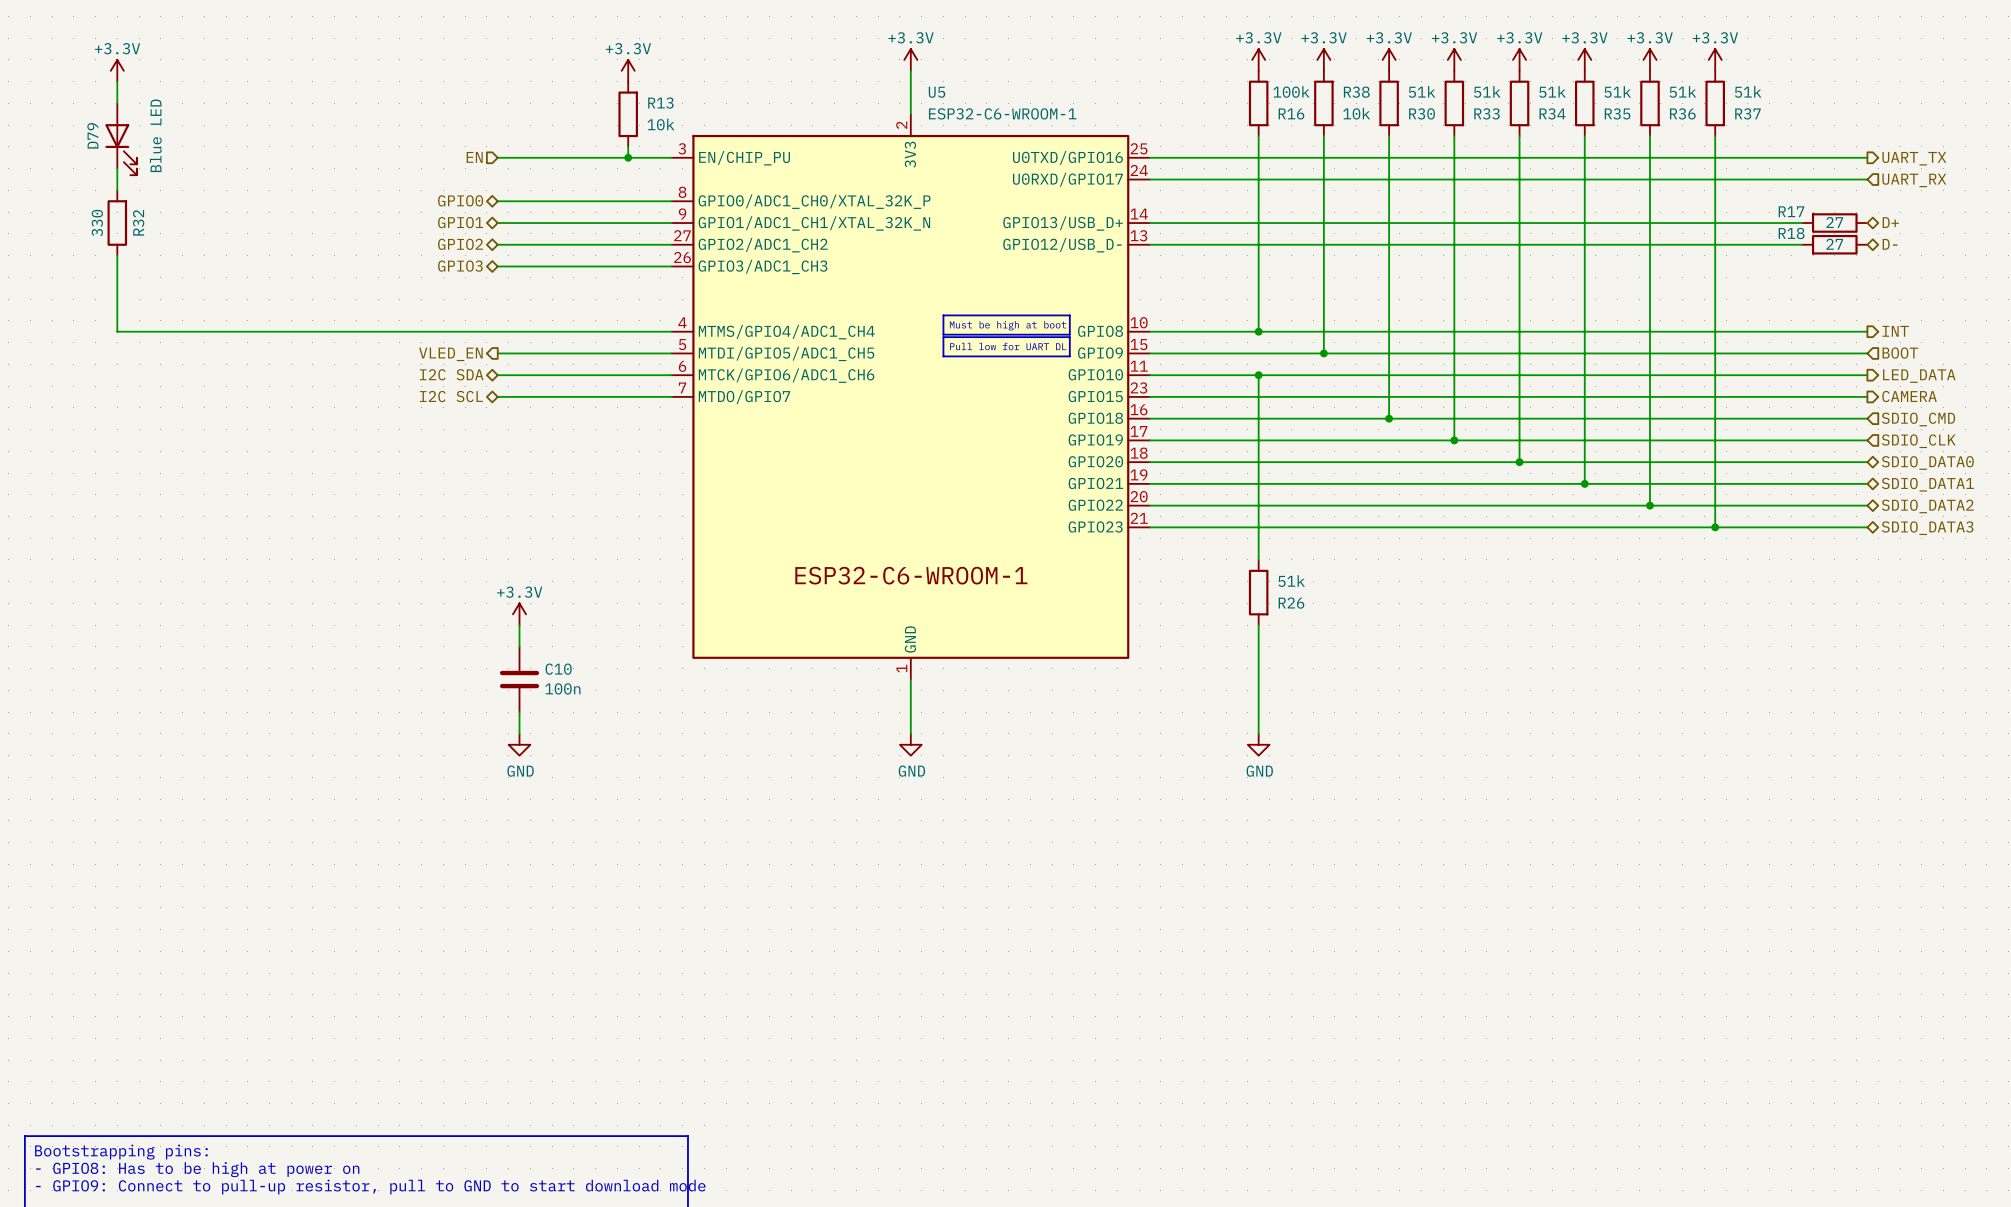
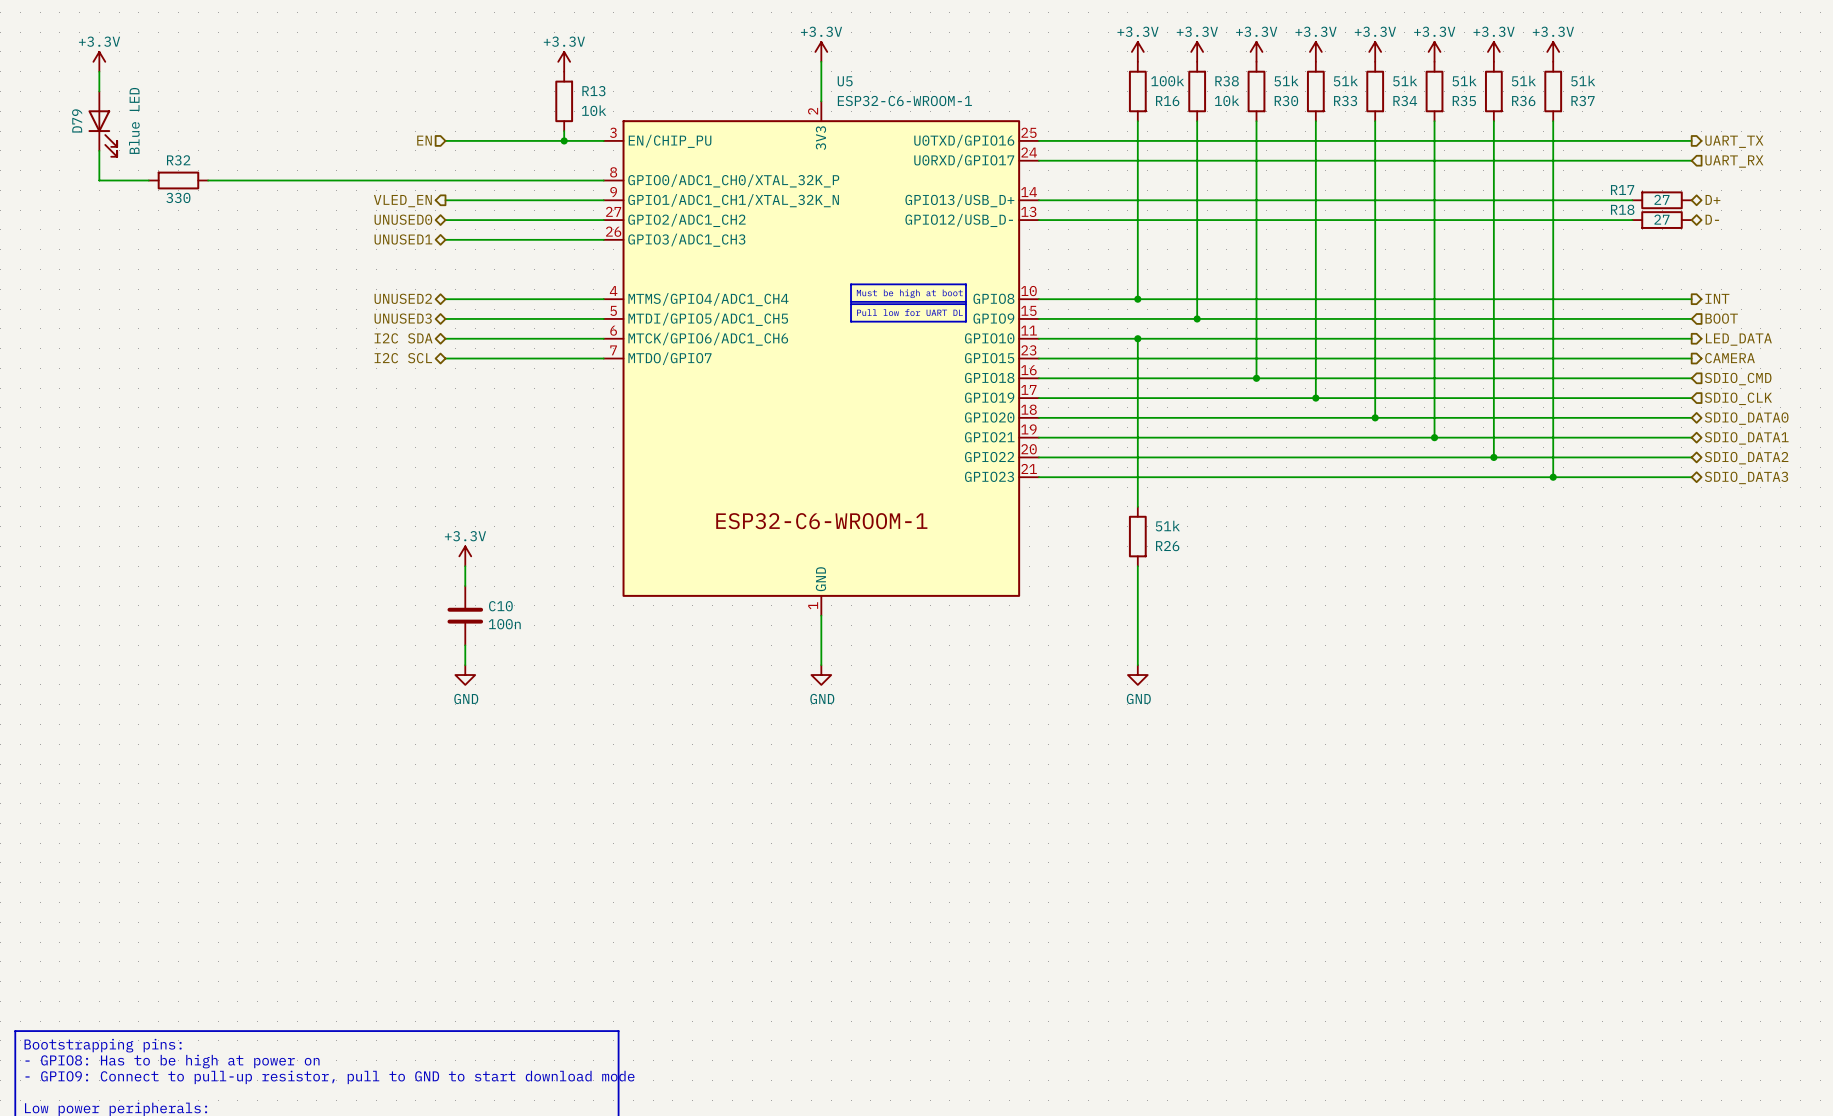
wire: none -> (99, 170) (99, 180) (148, 180)
hierarchical label: GPIO0 (460, 200) -> none
wire: none -> (208, 180) (445, 180)
R32 name position: R32 (138, 222) -> R32 (178, 160)
hierarchical label shape: bidirectional (460, 222) -> output (402, 201)
hierarchical label: GPIO1 (460, 222) -> VLED_EN (402, 201)
R32 value position: 330 (97, 223) -> 330 (178, 197)
R32 rotation: 0° (117, 223) -> 90° clockwise (178, 180)
R32 position: (117, 223) -> (178, 180)
hierarchical label: GPIO2 (460, 244) -> UNUSED0 (403, 219)
wire: (117, 255) (117, 331) (497, 331) -> none
hierarchical label: GPIO3 (460, 266) -> UNUSED1 (403, 239)
hierarchical label: none -> UNUSED2 (403, 298)
hierarchical label shape: output (450, 354) -> bidirectional (403, 318)
hierarchical label: VLED_EN (450, 354) -> UNUSED3 (403, 318)

